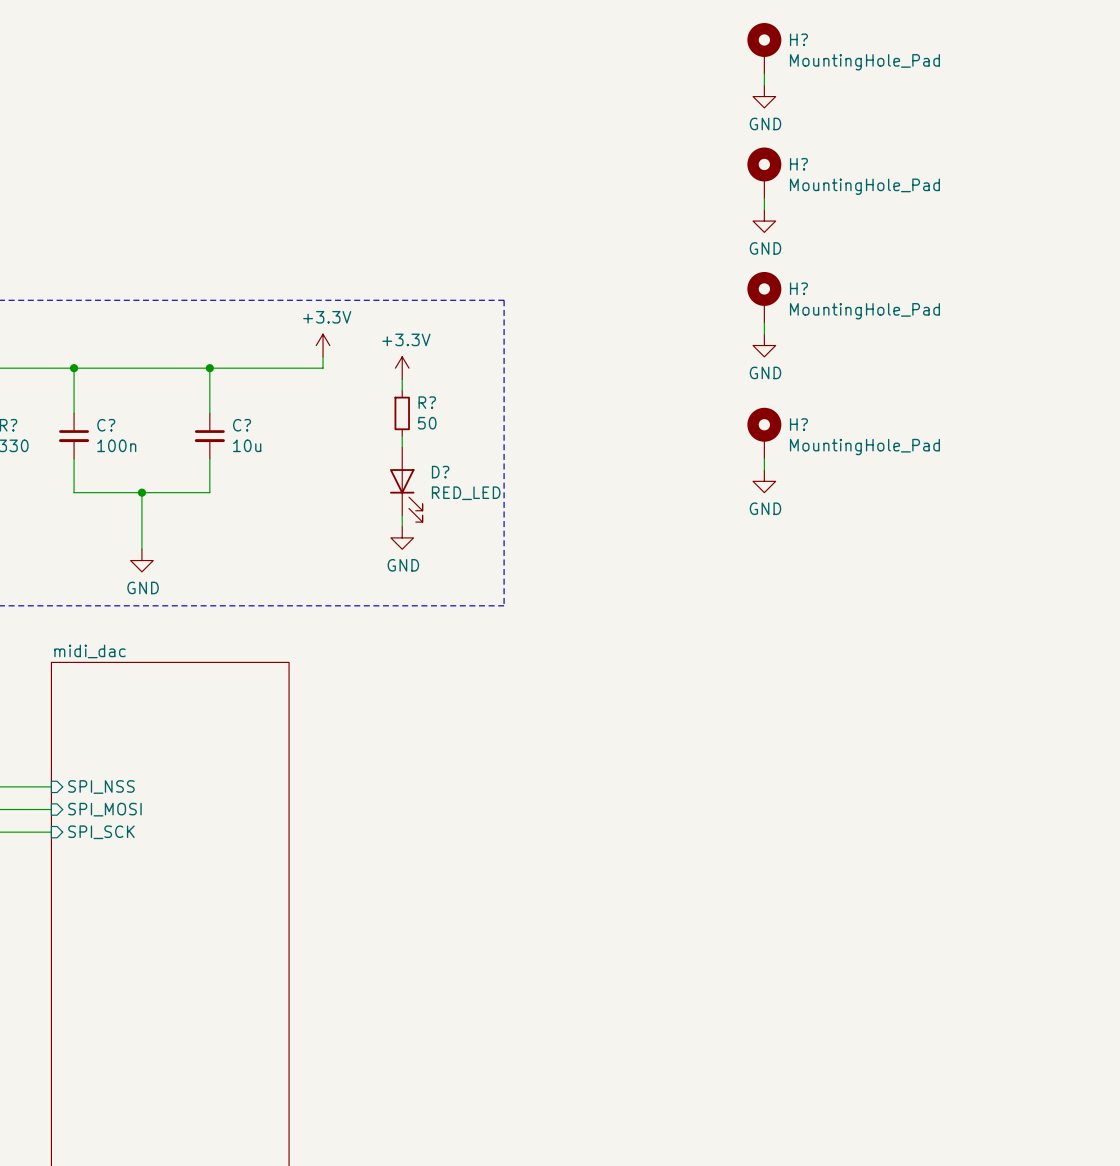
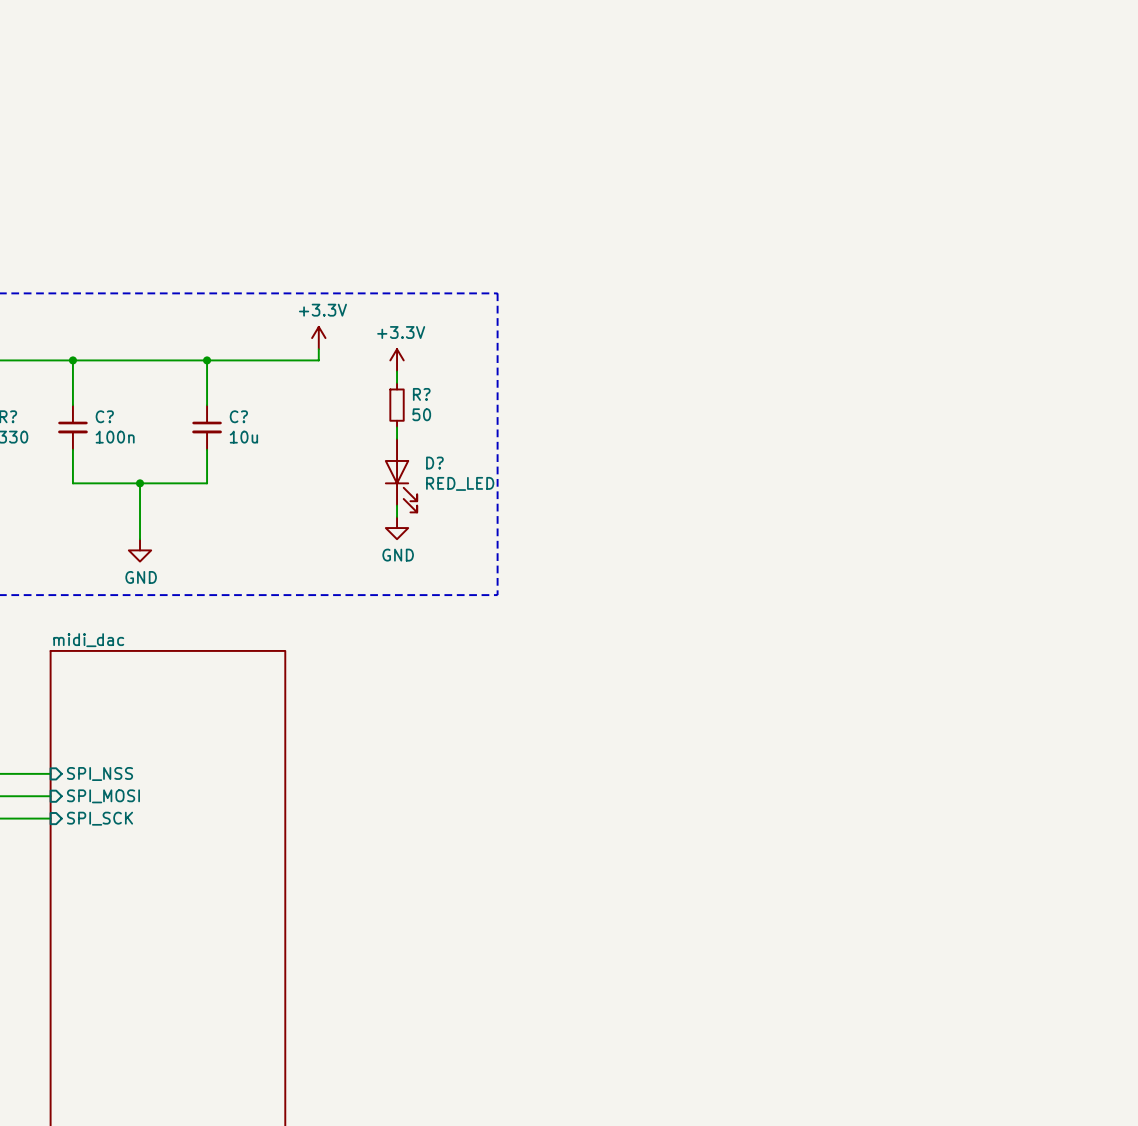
H?: MountingHole_Pad (764, 48) -> none
wire: (764, 73) (764, 85) -> none
power symbol: GND (764, 96) -> none
H?: MountingHole_Pad (764, 172) -> none
wire: (764, 198) (764, 209) -> none
power symbol: GND (764, 221) -> none
H?: MountingHole_Pad (764, 297) -> none
wire: (764, 322) (764, 334) -> none
power symbol: GND (764, 345) -> none
H?: MountingHole_Pad (764, 433) -> none
wire: (764, 458) (764, 470) -> none
power symbol: GND (764, 481) -> none

